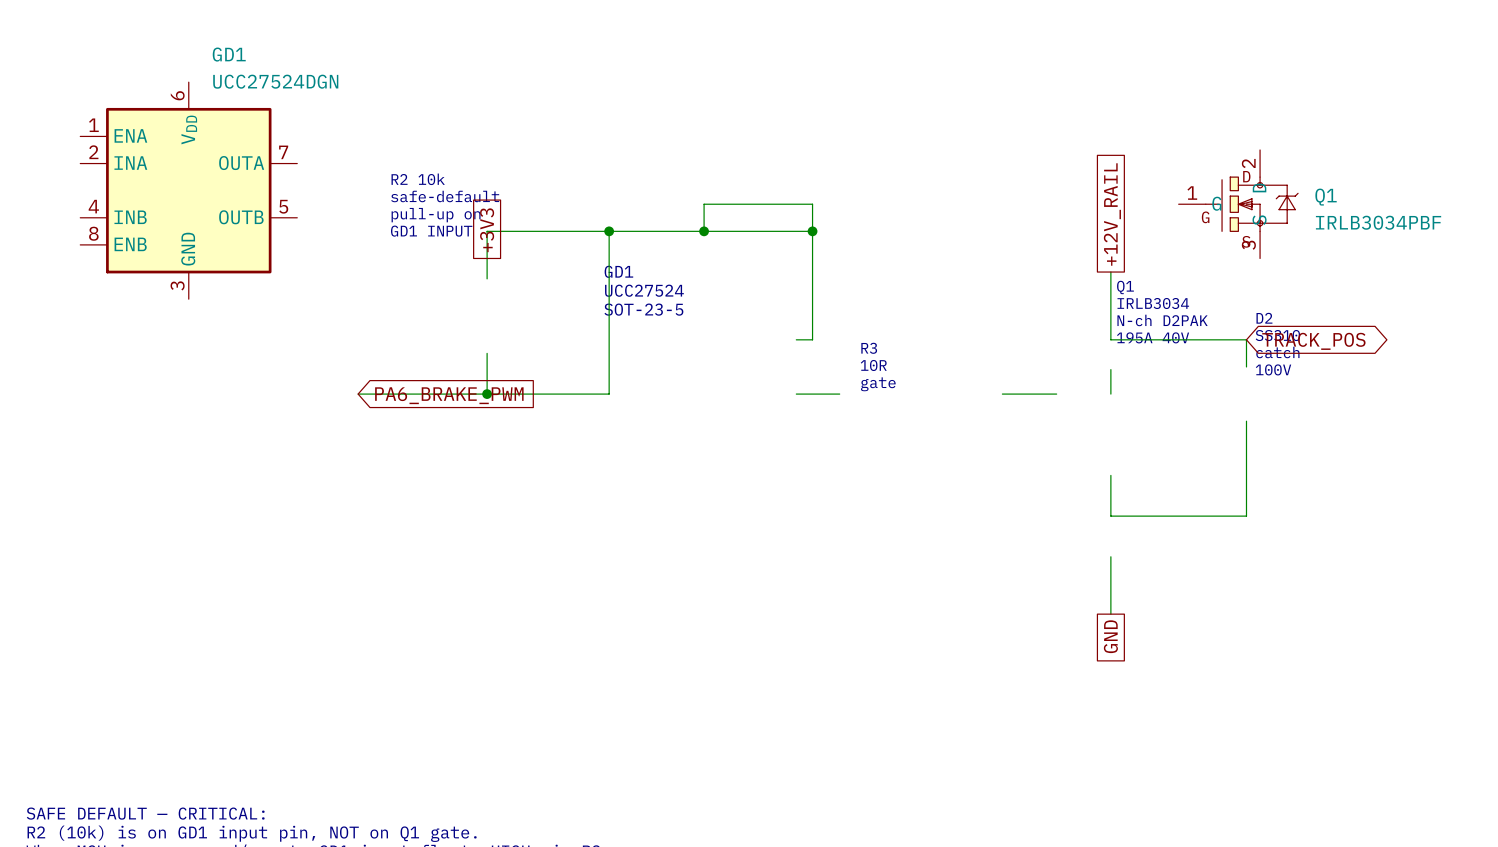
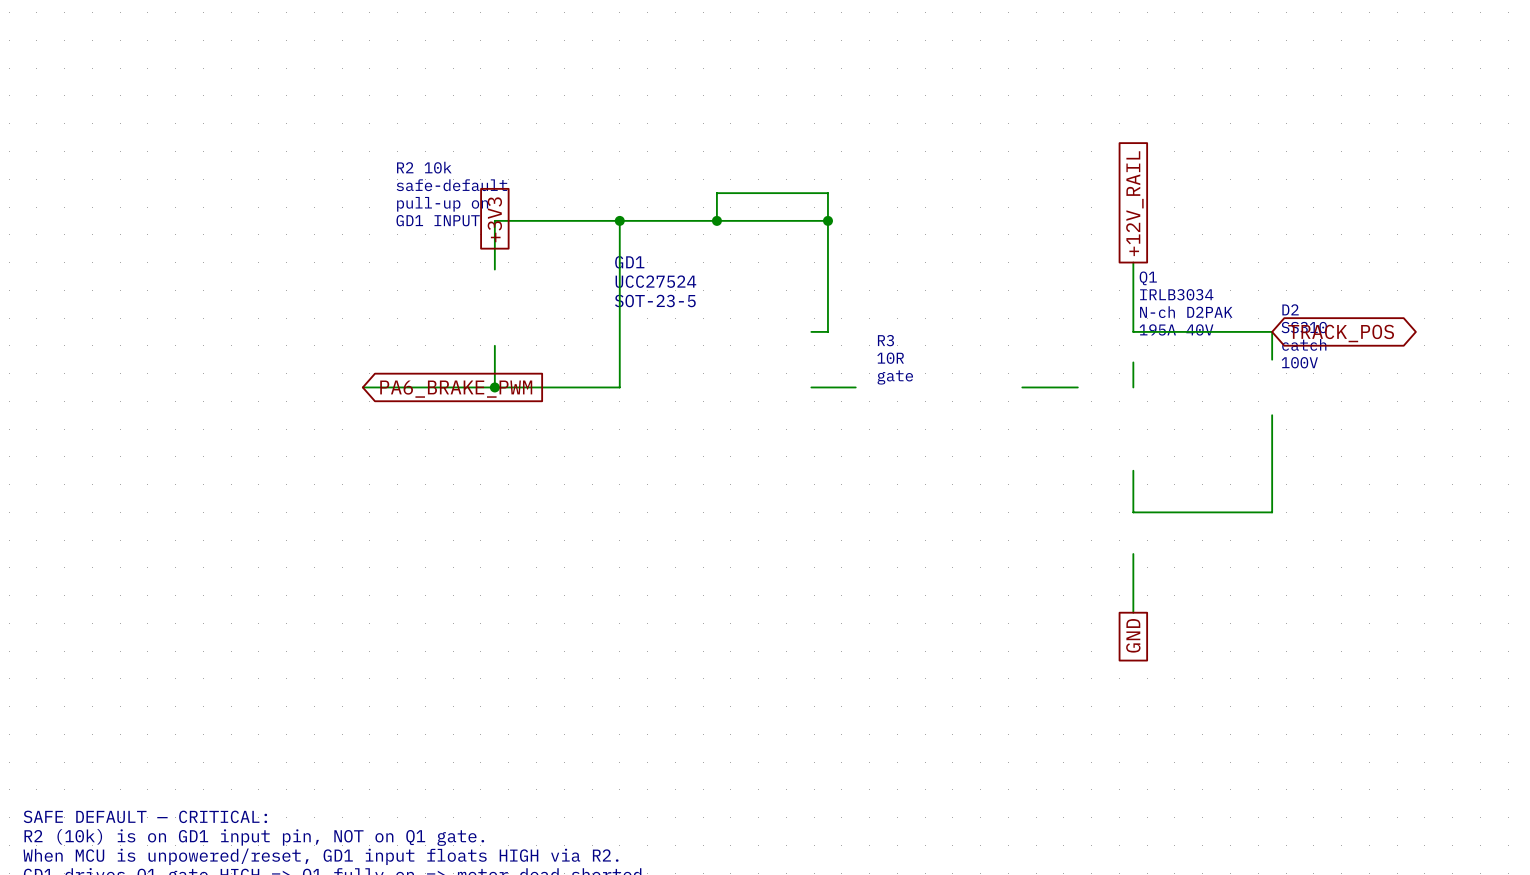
GD1: UCC27524DGN (188, 190) -> none
Q1: IRLB3034PBF (1238, 204) -> none

